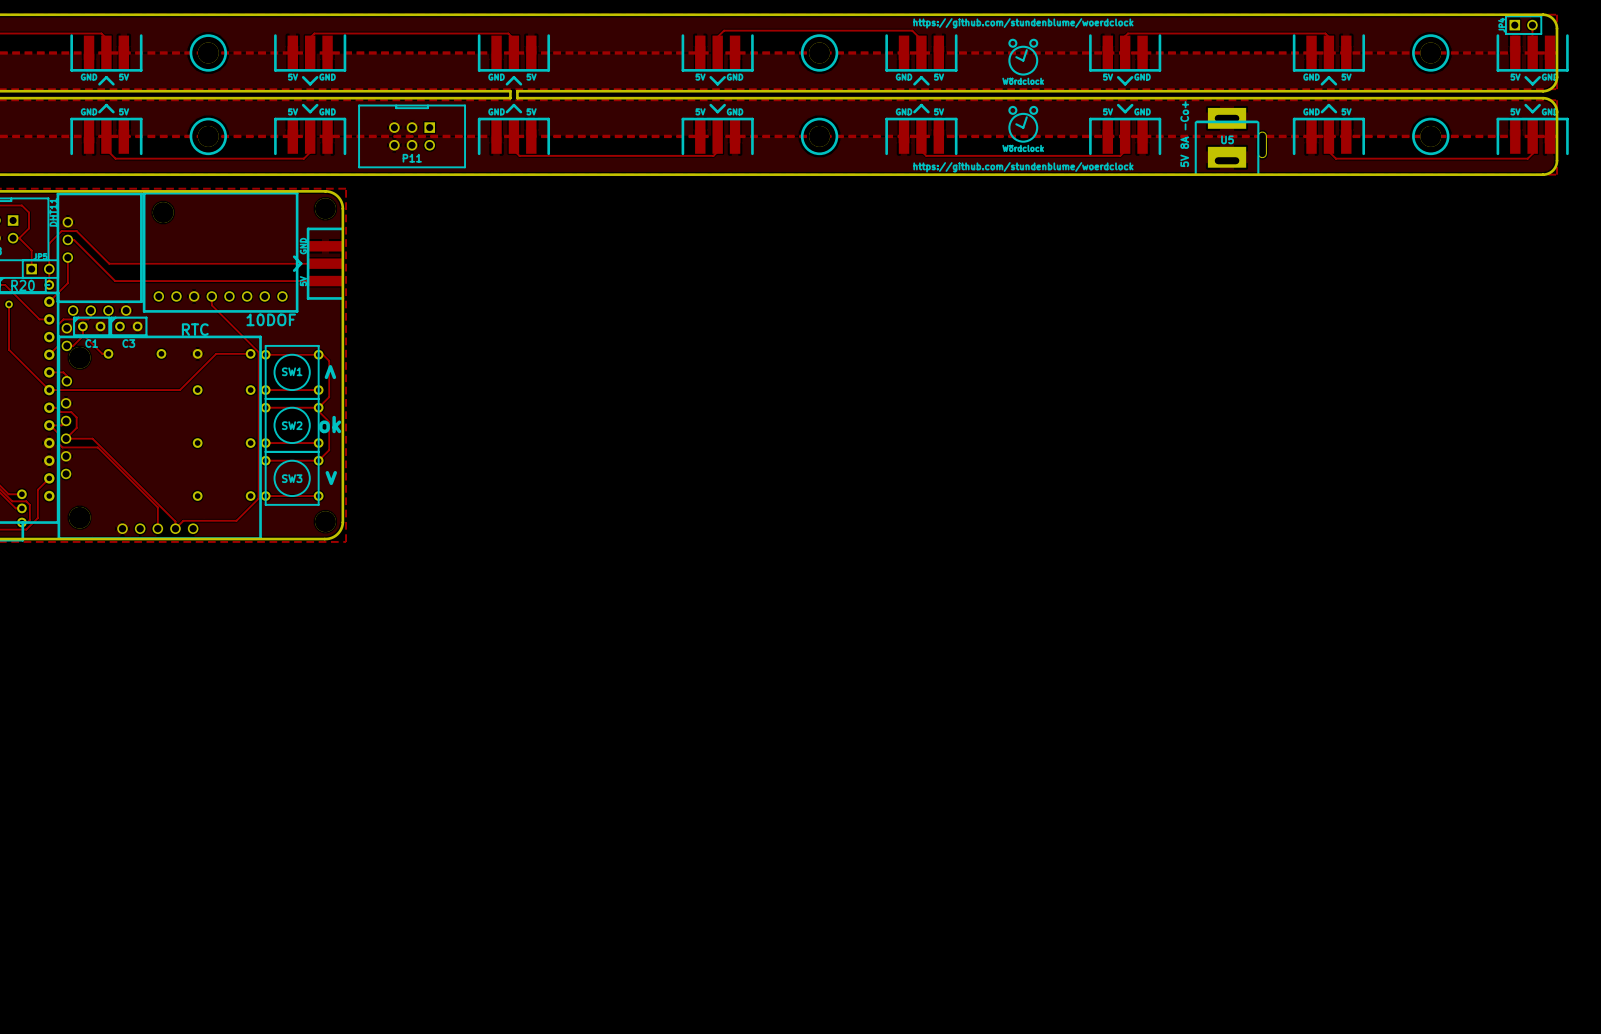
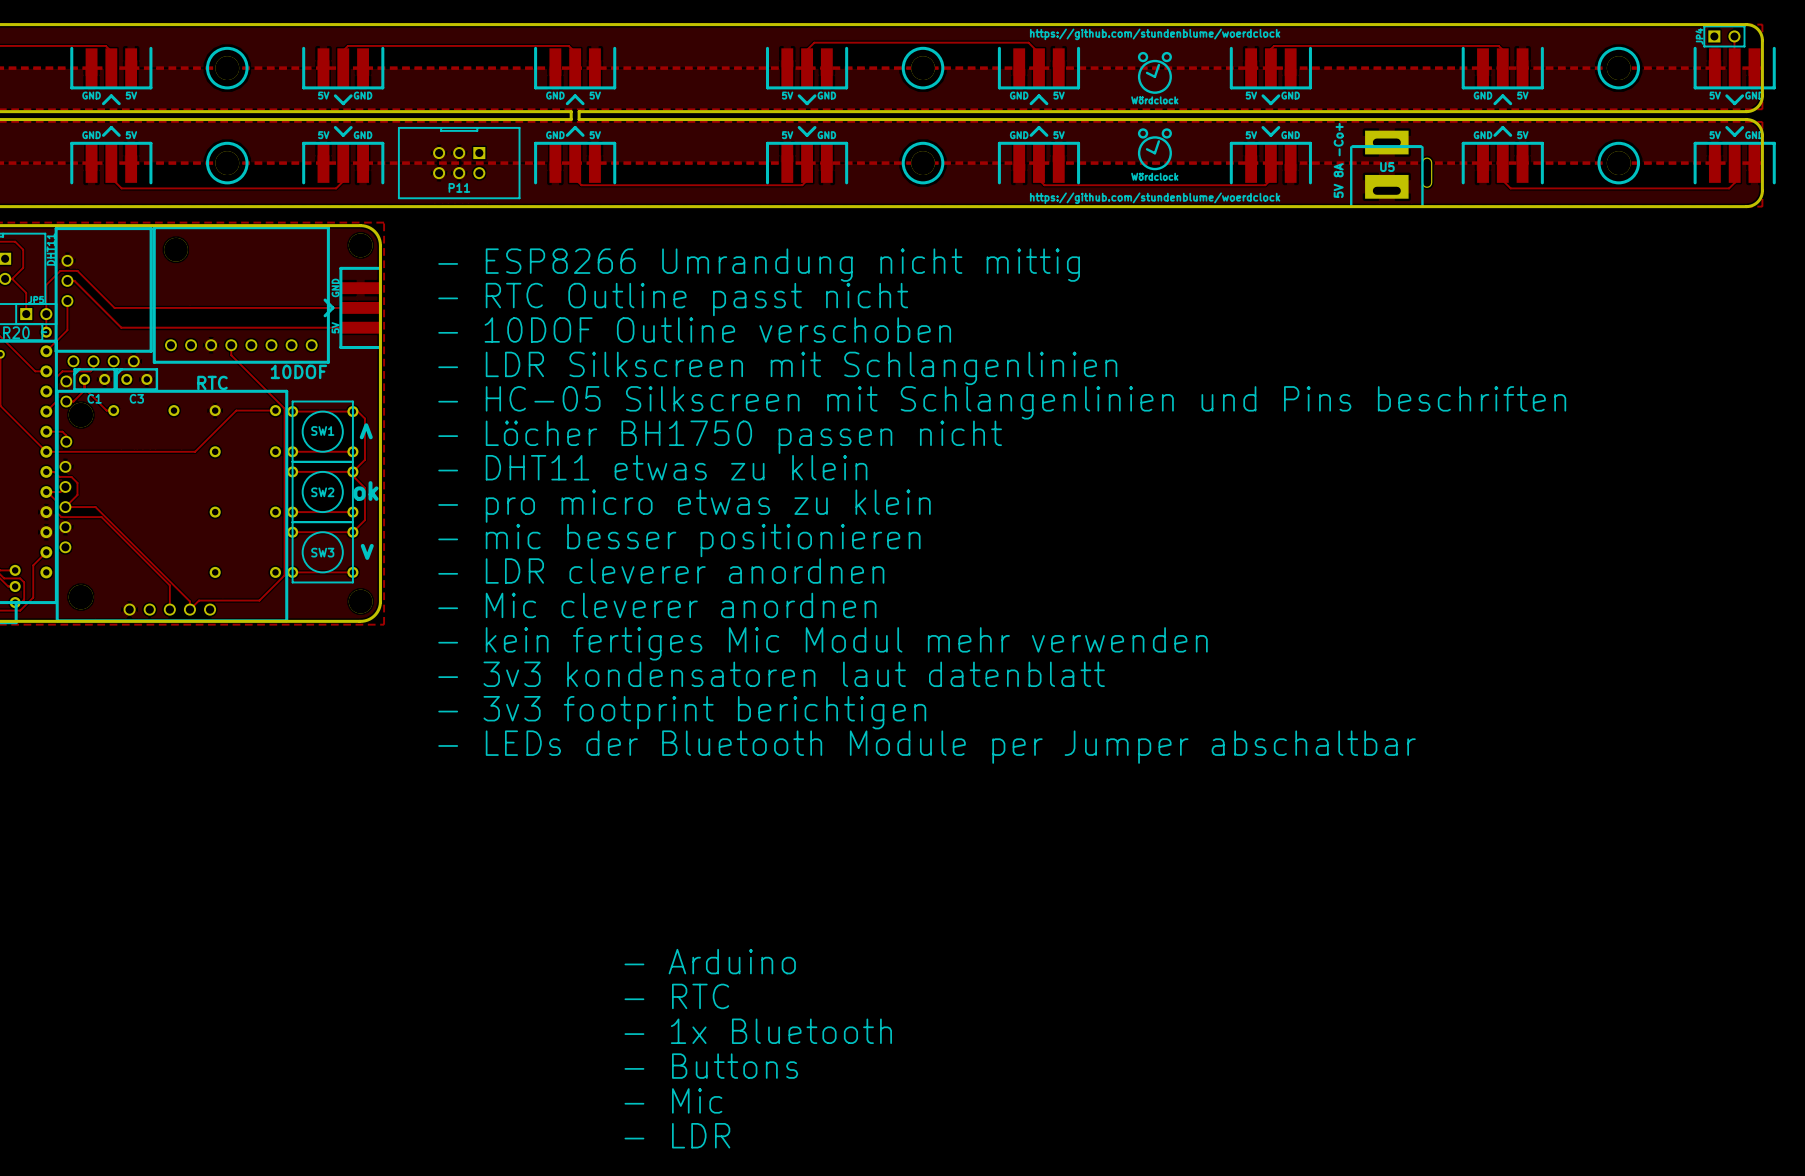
text: none -> - ESP8266 Umrandung nicht mittig (759, 265)
text: none -> - RTC Outline passt nicht (673, 299)
text: none -> - 10DOF Outline verschoben (694, 329)
text: none -> - LDR Silkscreen mit Schlangenlinien (777, 368)
text: none -> - HC-05 Silkscreen mit Schlangenlinien und Pins beschriften (1002, 402)
text: none -> - Löcher BH1750 passen nicht (720, 437)
text: none -> - DHT11 etwas zu klein (652, 467)
text: none -> - pro micro etwas zu klein (684, 506)
text: none -> - mic besser positionieren (679, 540)
text: none -> - LDR cleverer anordnen (661, 571)
text: none -> - Mic cleverer anordnen (657, 605)
text: none -> - kein fertiges Mic Modul mehr verwenden (823, 643)
text: none -> - 3v3 kondensatoren laut datenblatt (771, 674)
text: none -> - 3v3 footprint berichtigen (682, 712)
text: none -> - LEDs der Bluetooth Module per Jumper abschaltbar (927, 747)
text: none -> - Arduino (710, 961)
text: none -> - RTC (676, 996)
text: none -> - 1x Bluetooth (758, 1031)
text: none -> - Buttons (711, 1066)
text: none -> - Mic (673, 1100)
text: none -> - LDR (677, 1135)

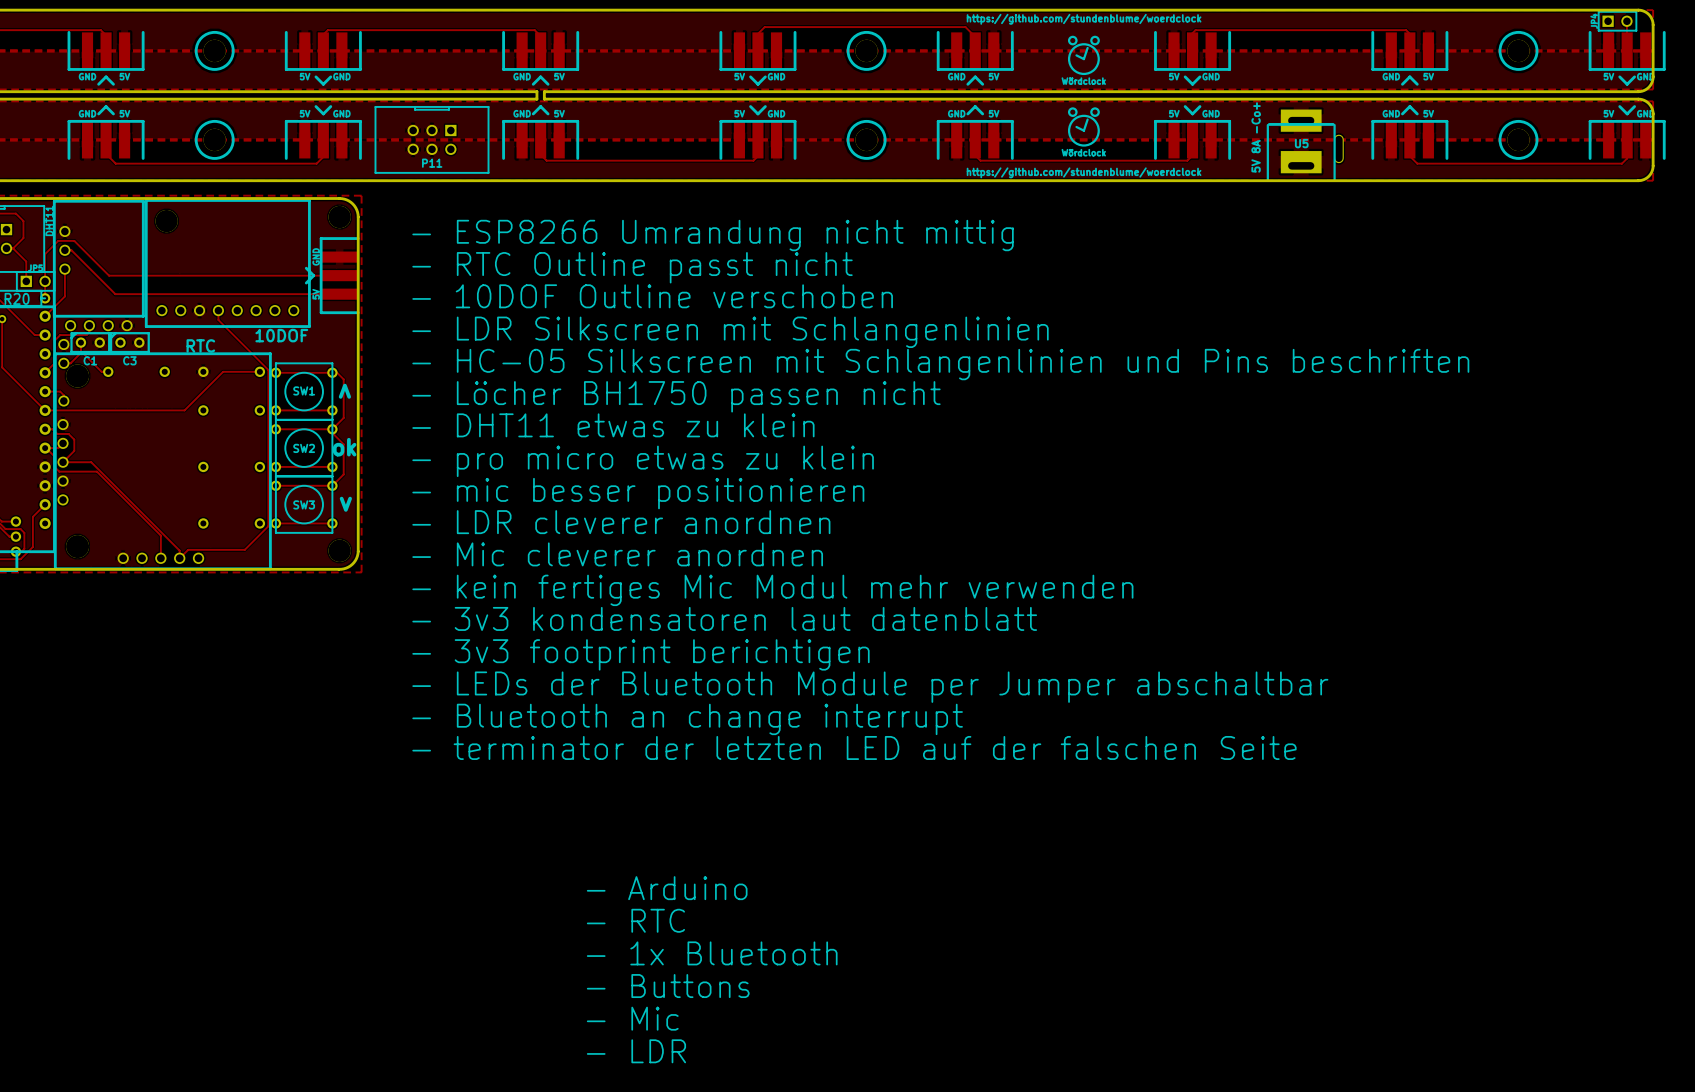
text: none -> - Bluetooth an change interrupt (687, 719)
text: none -> - terminator der letzten LED auf der falschen Seite (854, 747)

